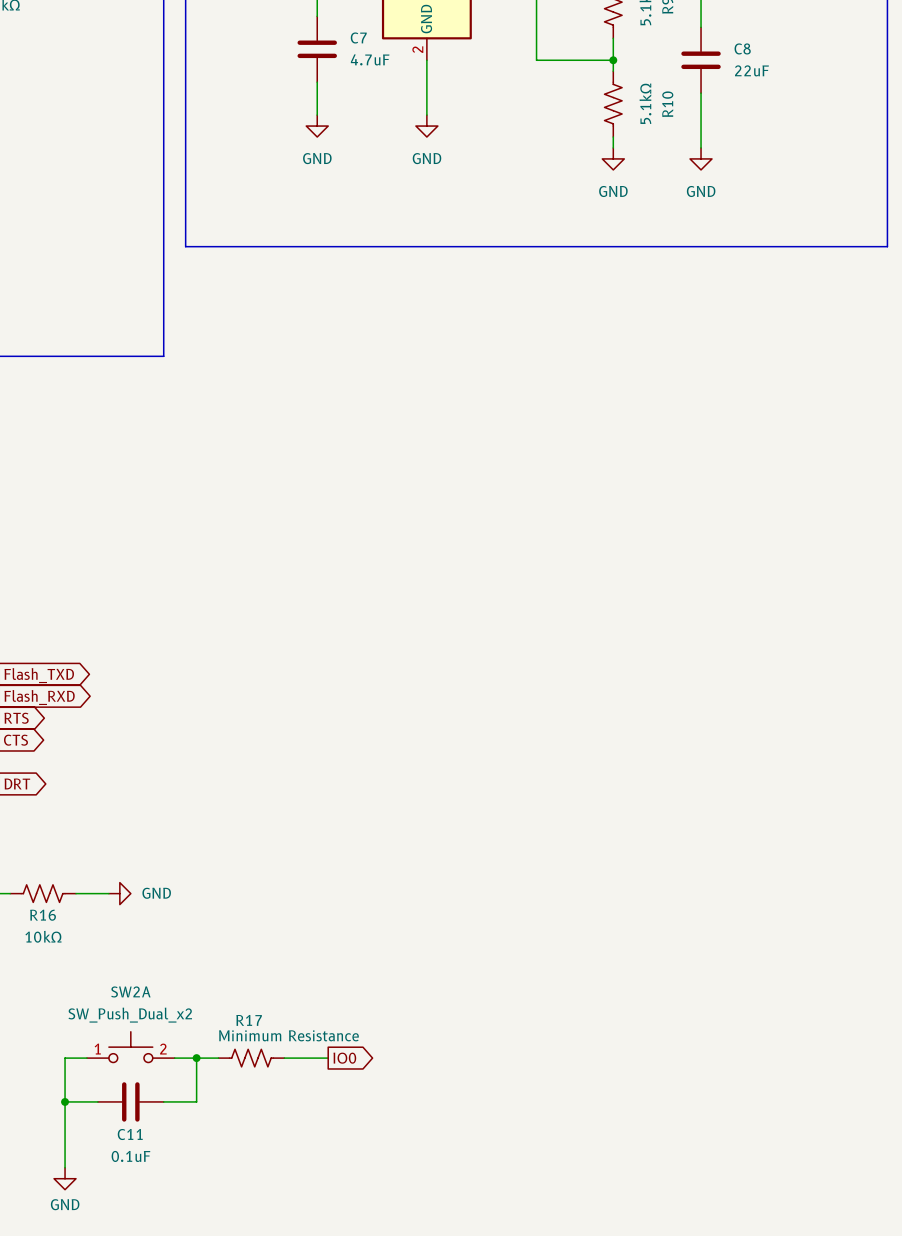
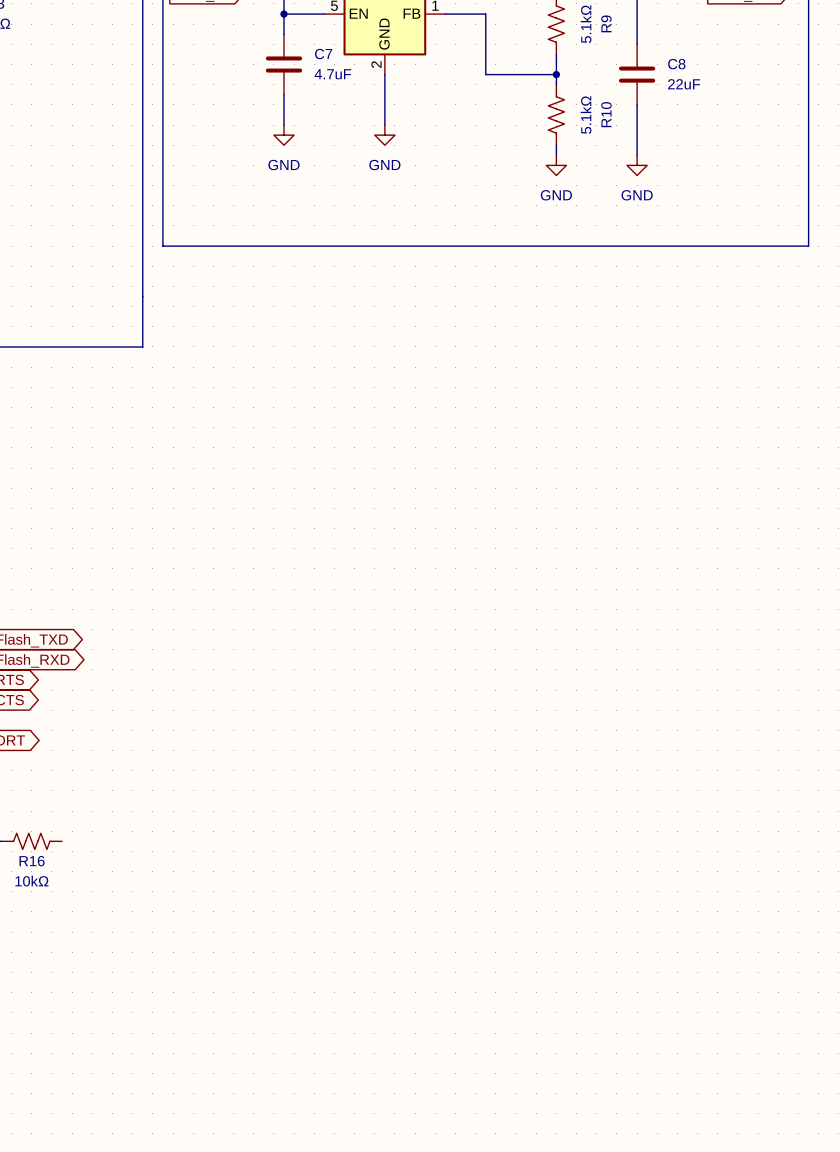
wire: (76, 893) (108, 893) -> none
power symbol: GND (119, 893) -> none
SW2A: SW_Push_Dual_x2 (130, 1047) -> none
wire: (86, 1058) (65, 1058) (65, 1167) -> none
wire: (174, 1058) (218, 1058) -> none
wire: (196, 1058) (196, 1101) (163, 1101) -> none
junction: (196, 1058) -> none
R17: Minimum Resistance (251, 1058) -> none
wire: (284, 1058) (328, 1058) -> none
global label: IO0 (344, 1058) -> none
wire: (65, 1101) (97, 1101) -> none
junction: (65, 1101) -> none
C11: 0.1uF (130, 1101) -> none
power symbol: GND (65, 1178) -> none

